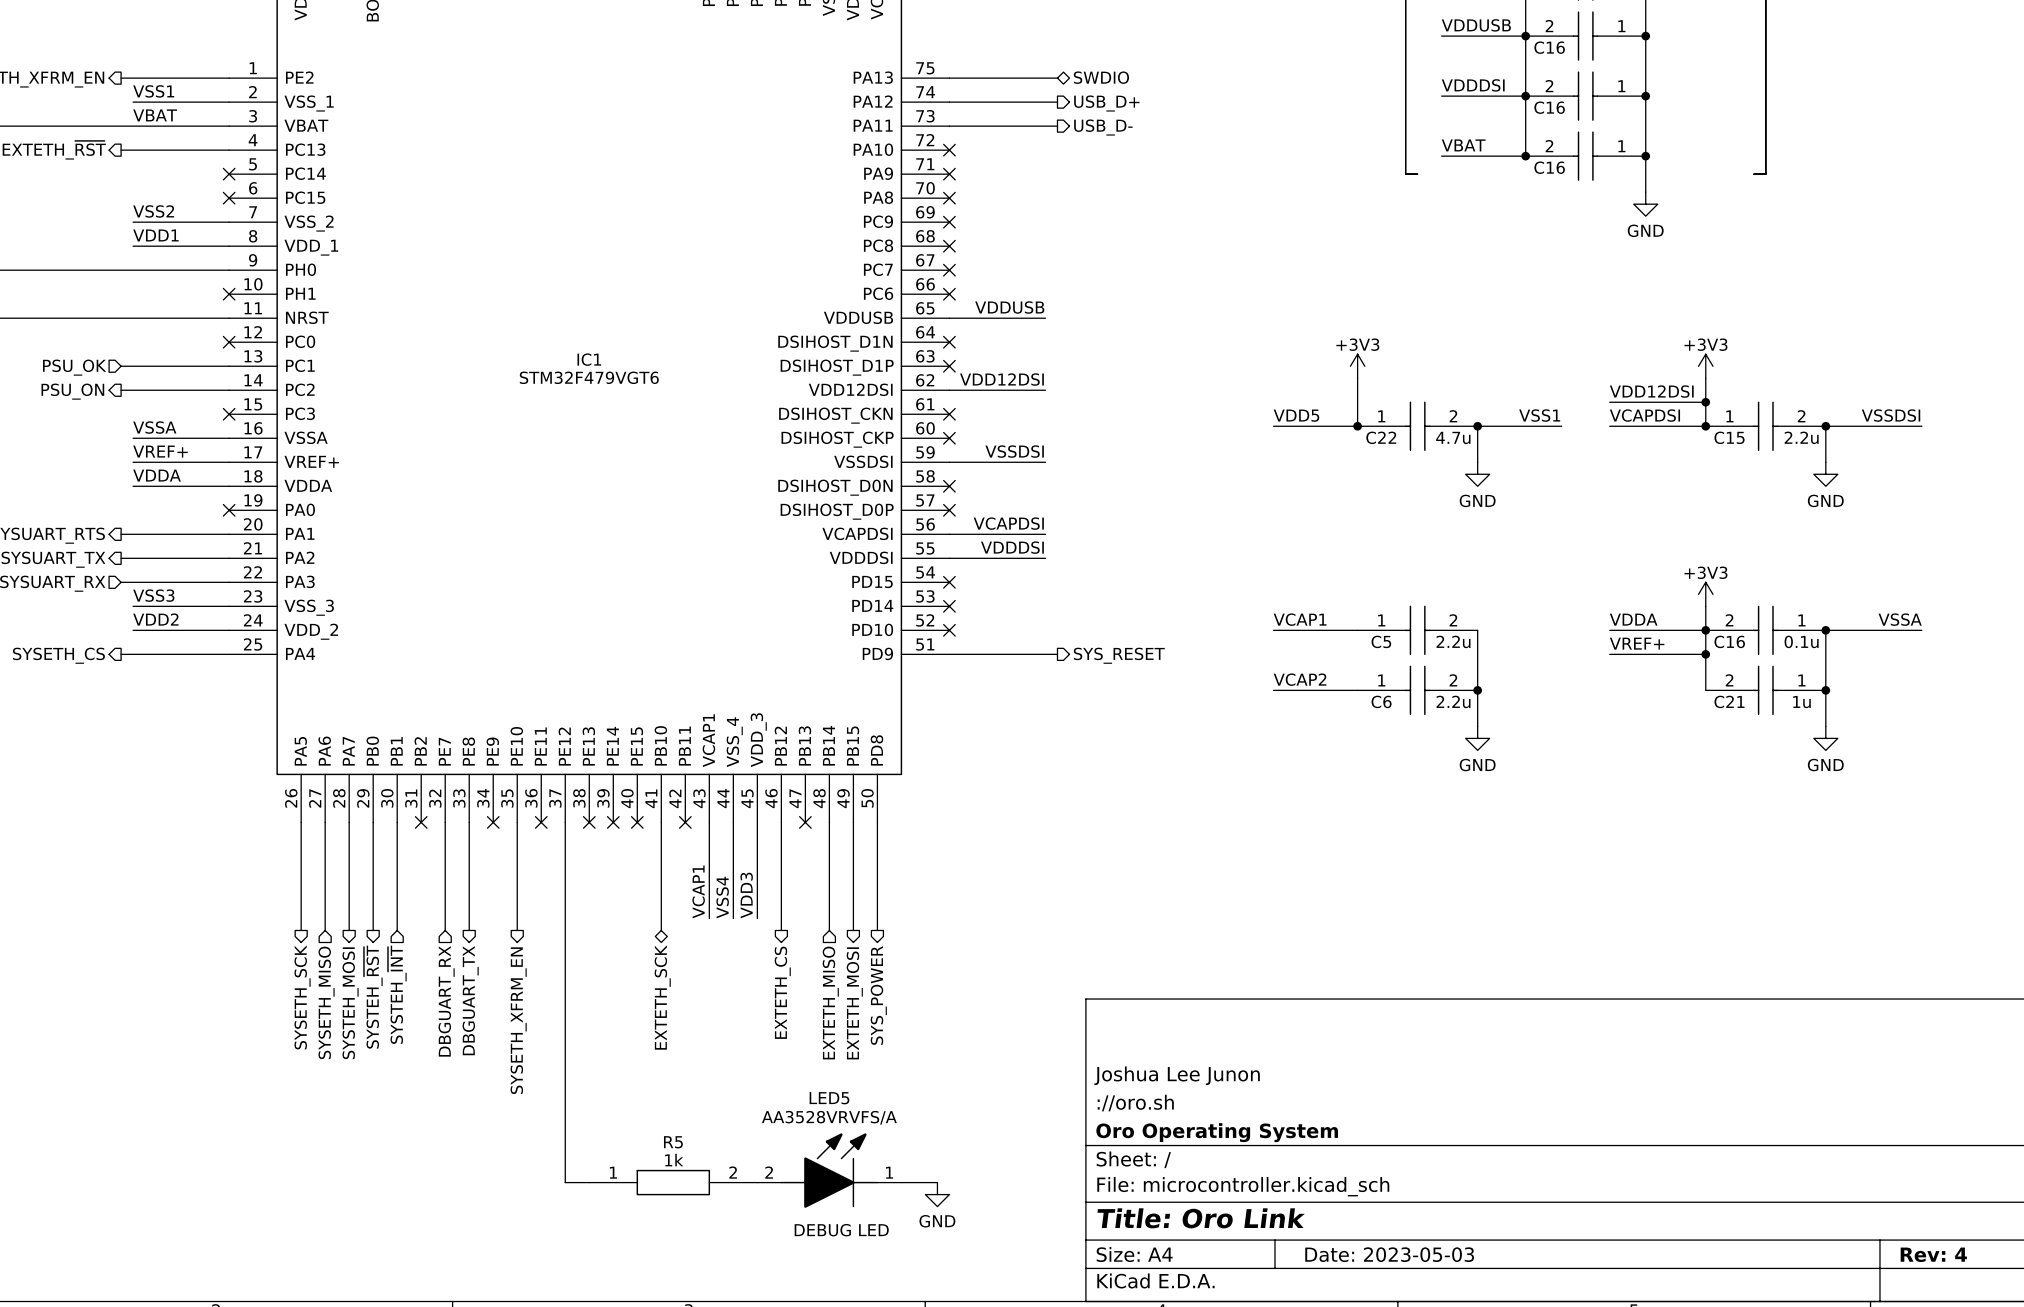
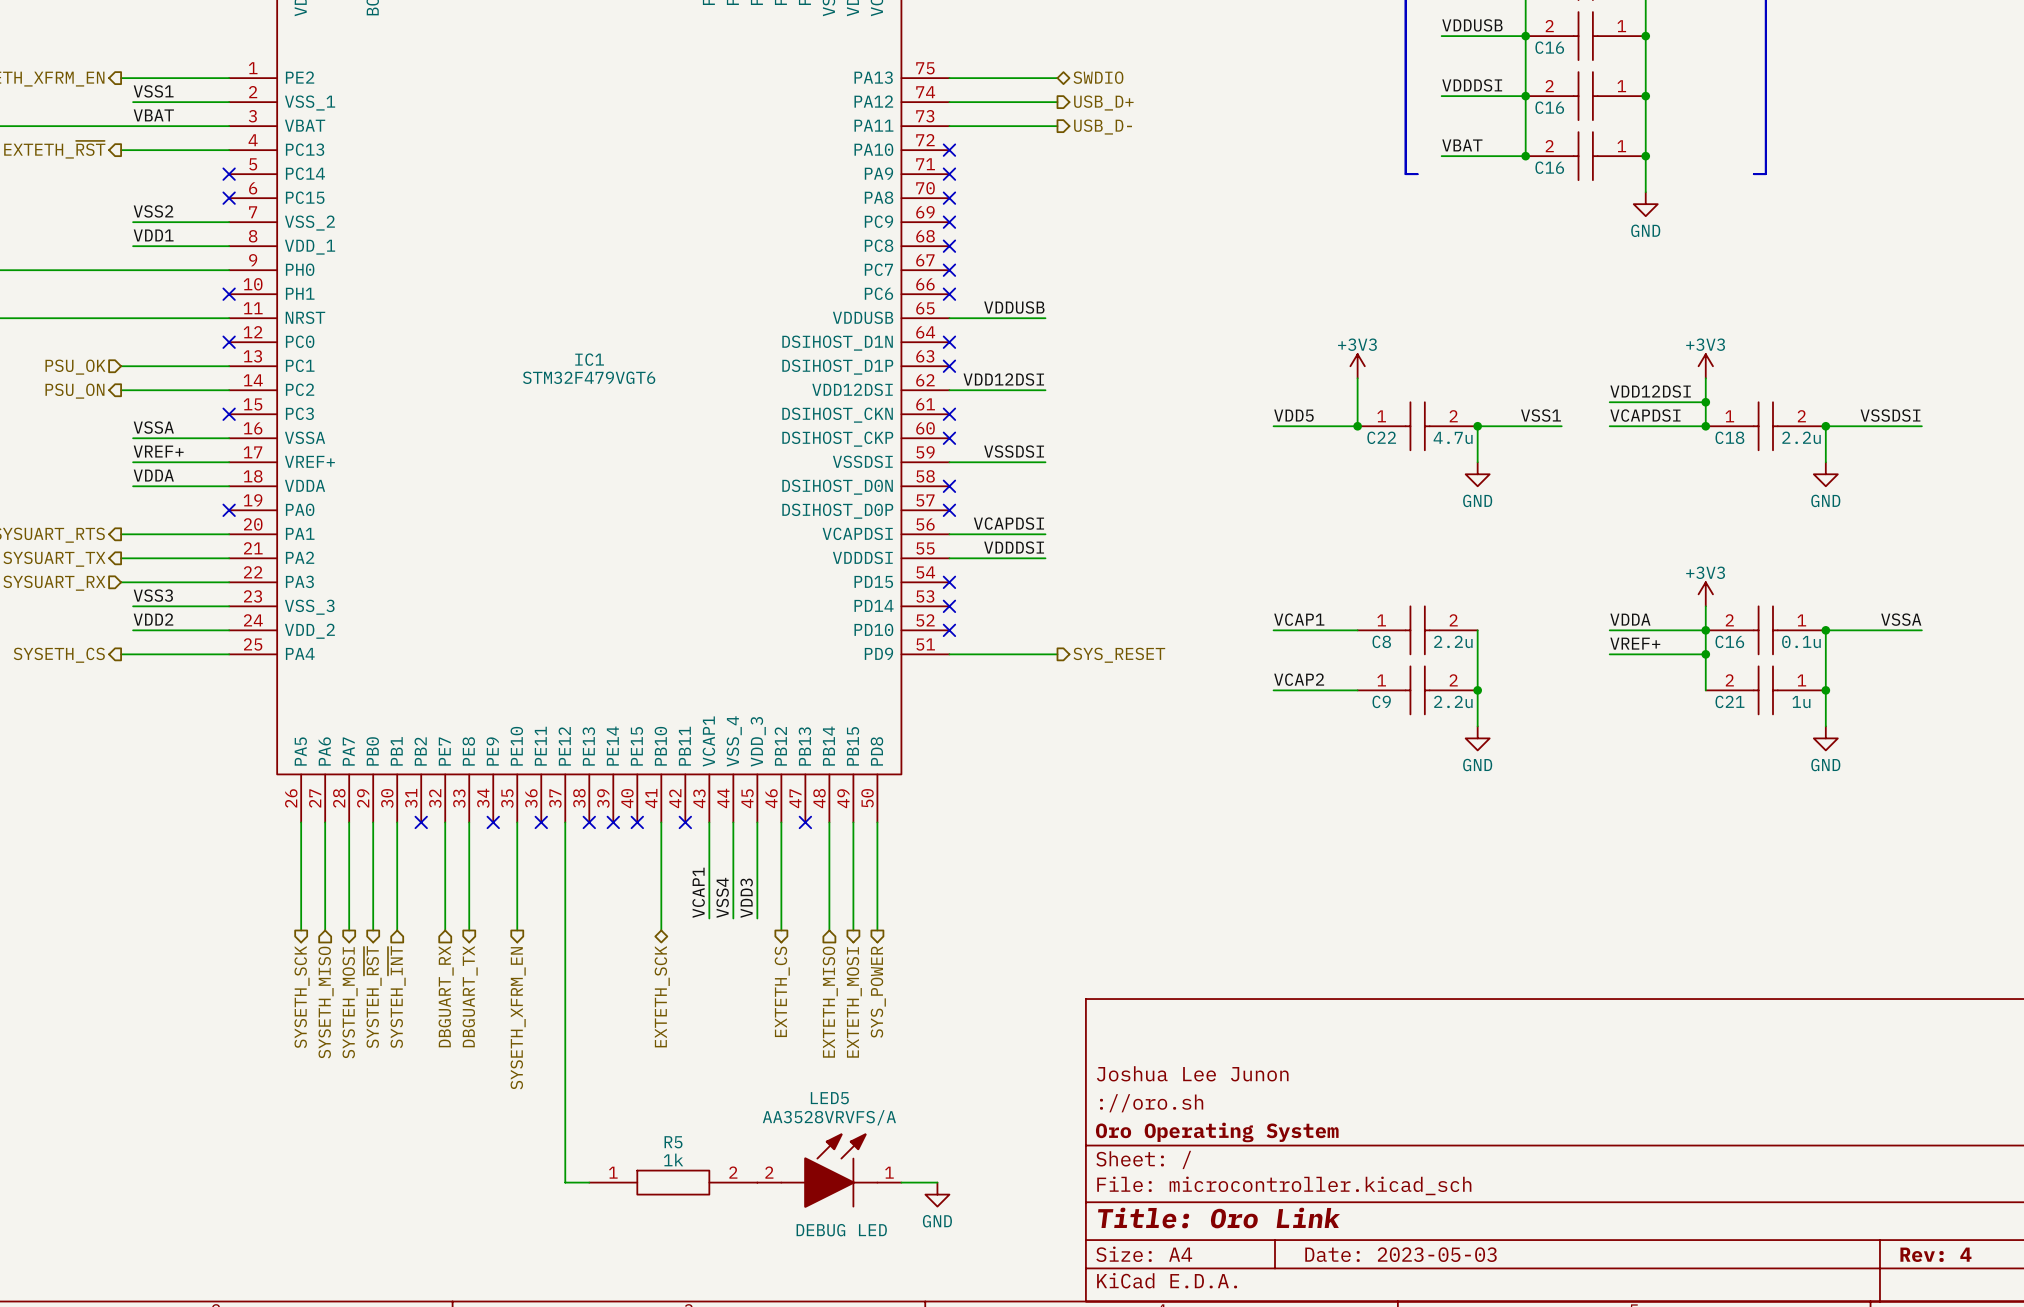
C15 name: C15 (1729, 437) -> C18 (1729, 437)
C5 name: C5 (1381, 641) -> C8 (1381, 641)
C6 name: C6 (1381, 701) -> C9 (1381, 701)

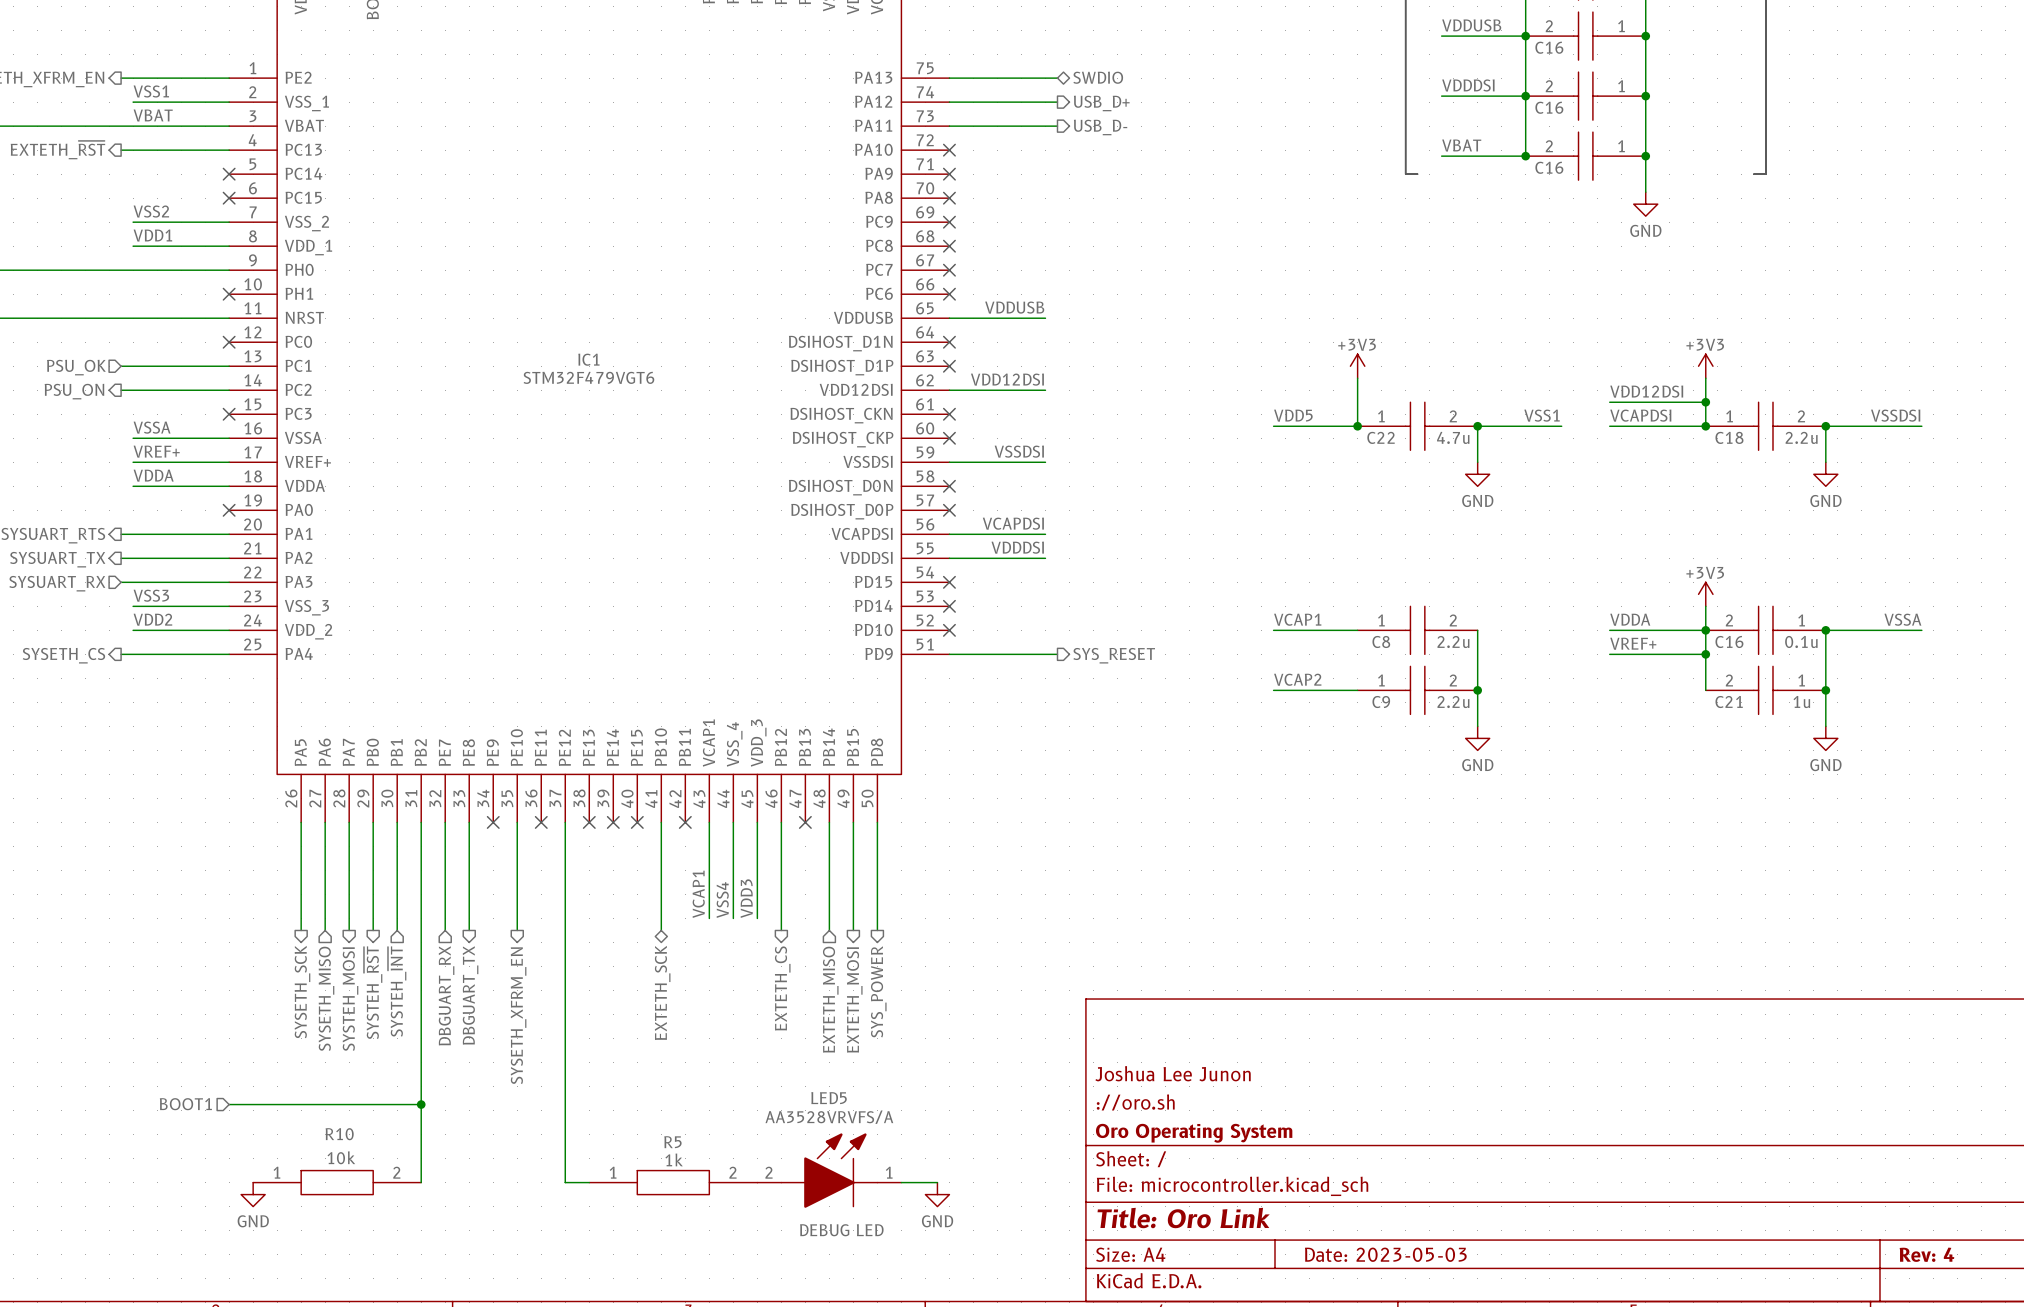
wire: none -> (421, 822) (421, 1182)
no-connect mark: (421, 822) -> none
hierarchical label: none -> BOOT1 (185, 1104)
wire: none -> (229, 1104) (421, 1104)
junction: none -> (421, 1104)
R10: none -> 10k (337, 1182)
power symbol: none -> GND (253, 1194)

